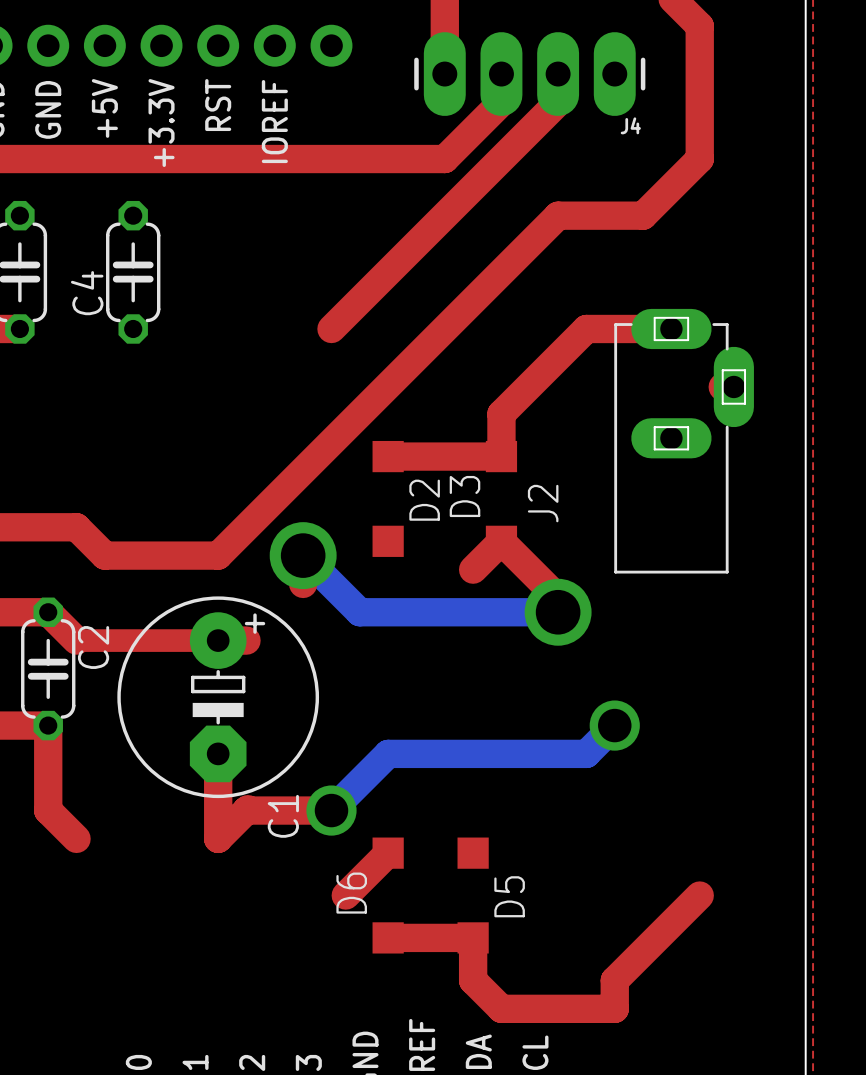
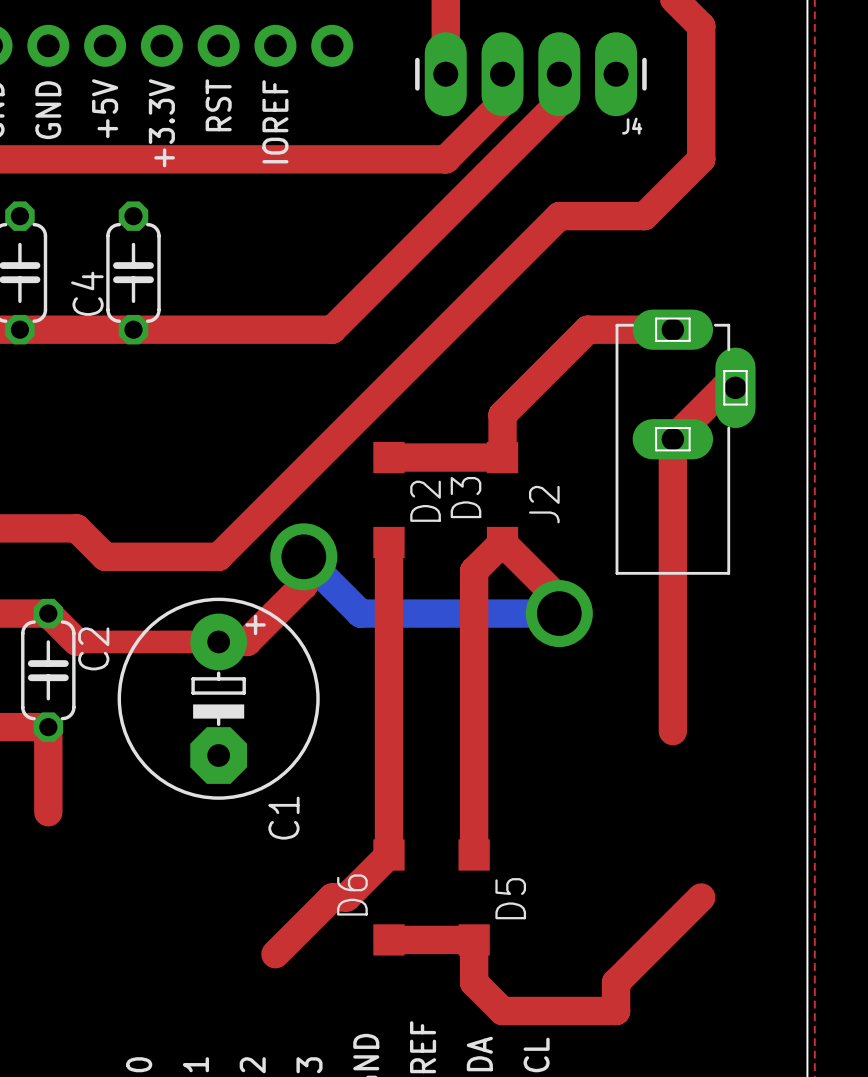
top track: none -> (19, 329) (332, 329)
top track: none -> (724, 387) (672, 439) (672, 731)
top track: none -> (388, 542) (388, 854)
top track: none -> (474, 570) (474, 854)
top track: none -> (303, 585) (247, 641)
bottom track: (614, 725) (586, 753) (388, 753) (331, 810) -> none
via: (614, 725) -> none
top track: (218, 753) (218, 838) (247, 809) -> none
top track: (48, 810) (76, 838) -> none
top track: (246, 810) (331, 810) -> none
via: (331, 810) -> none
top track: none -> (346, 897) (332, 897) (275, 954)

